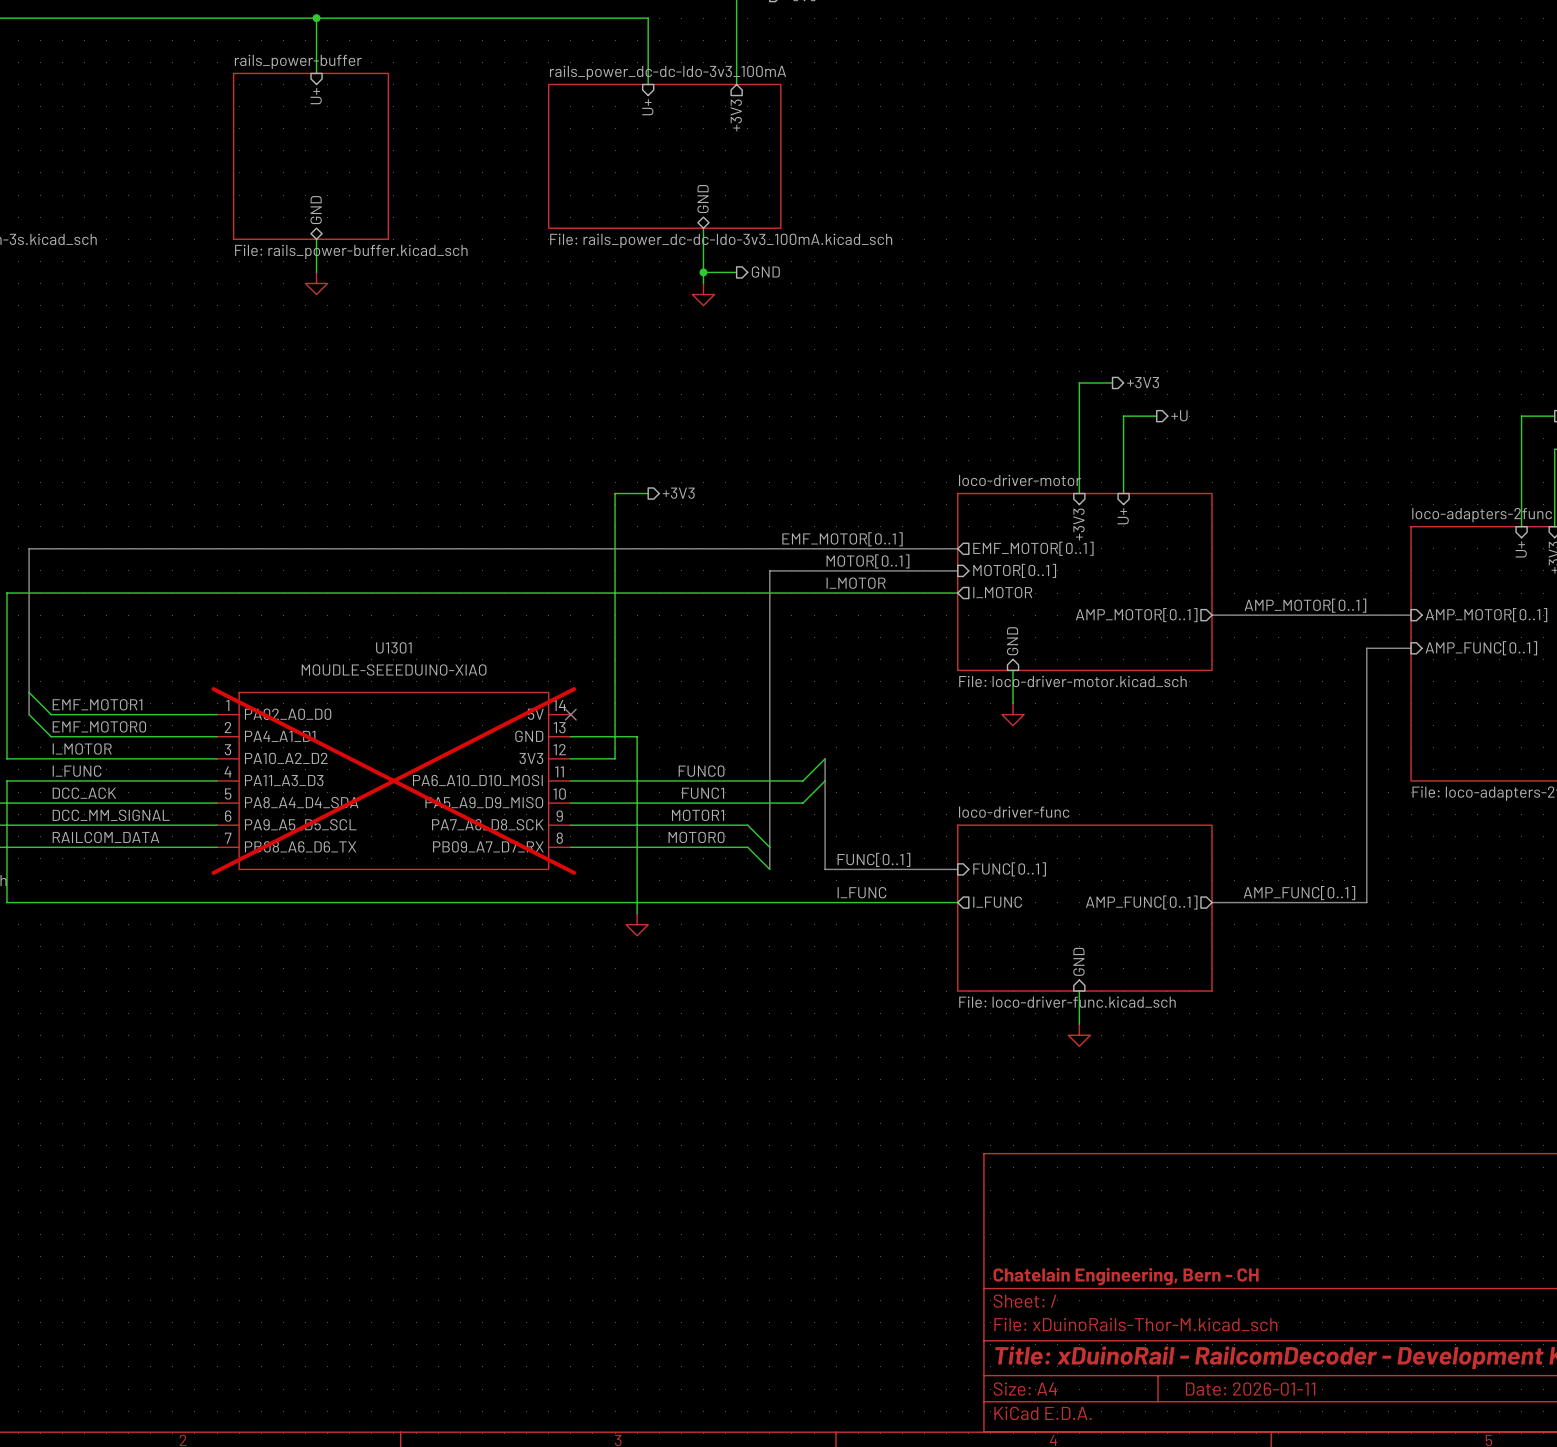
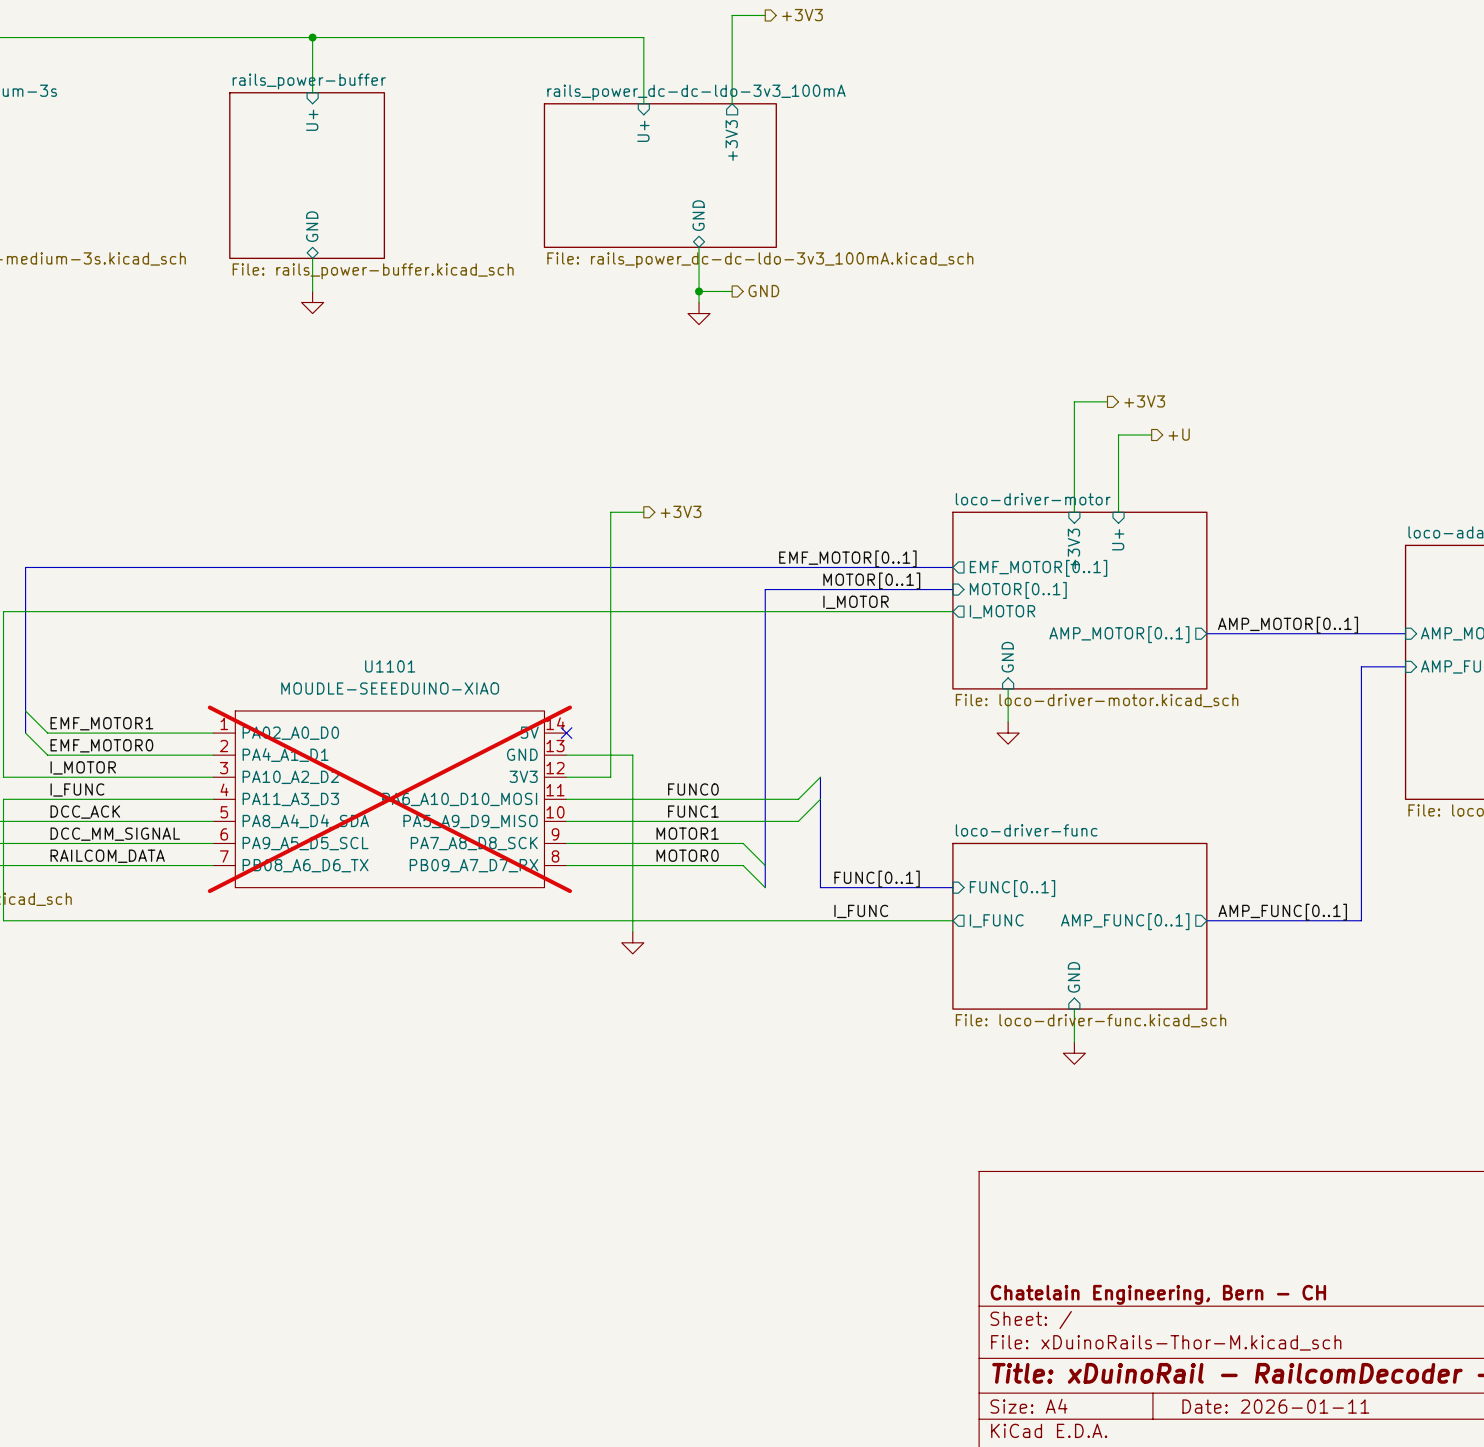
U1301 name: U1301 (393, 647) -> U1101 (390, 666)

